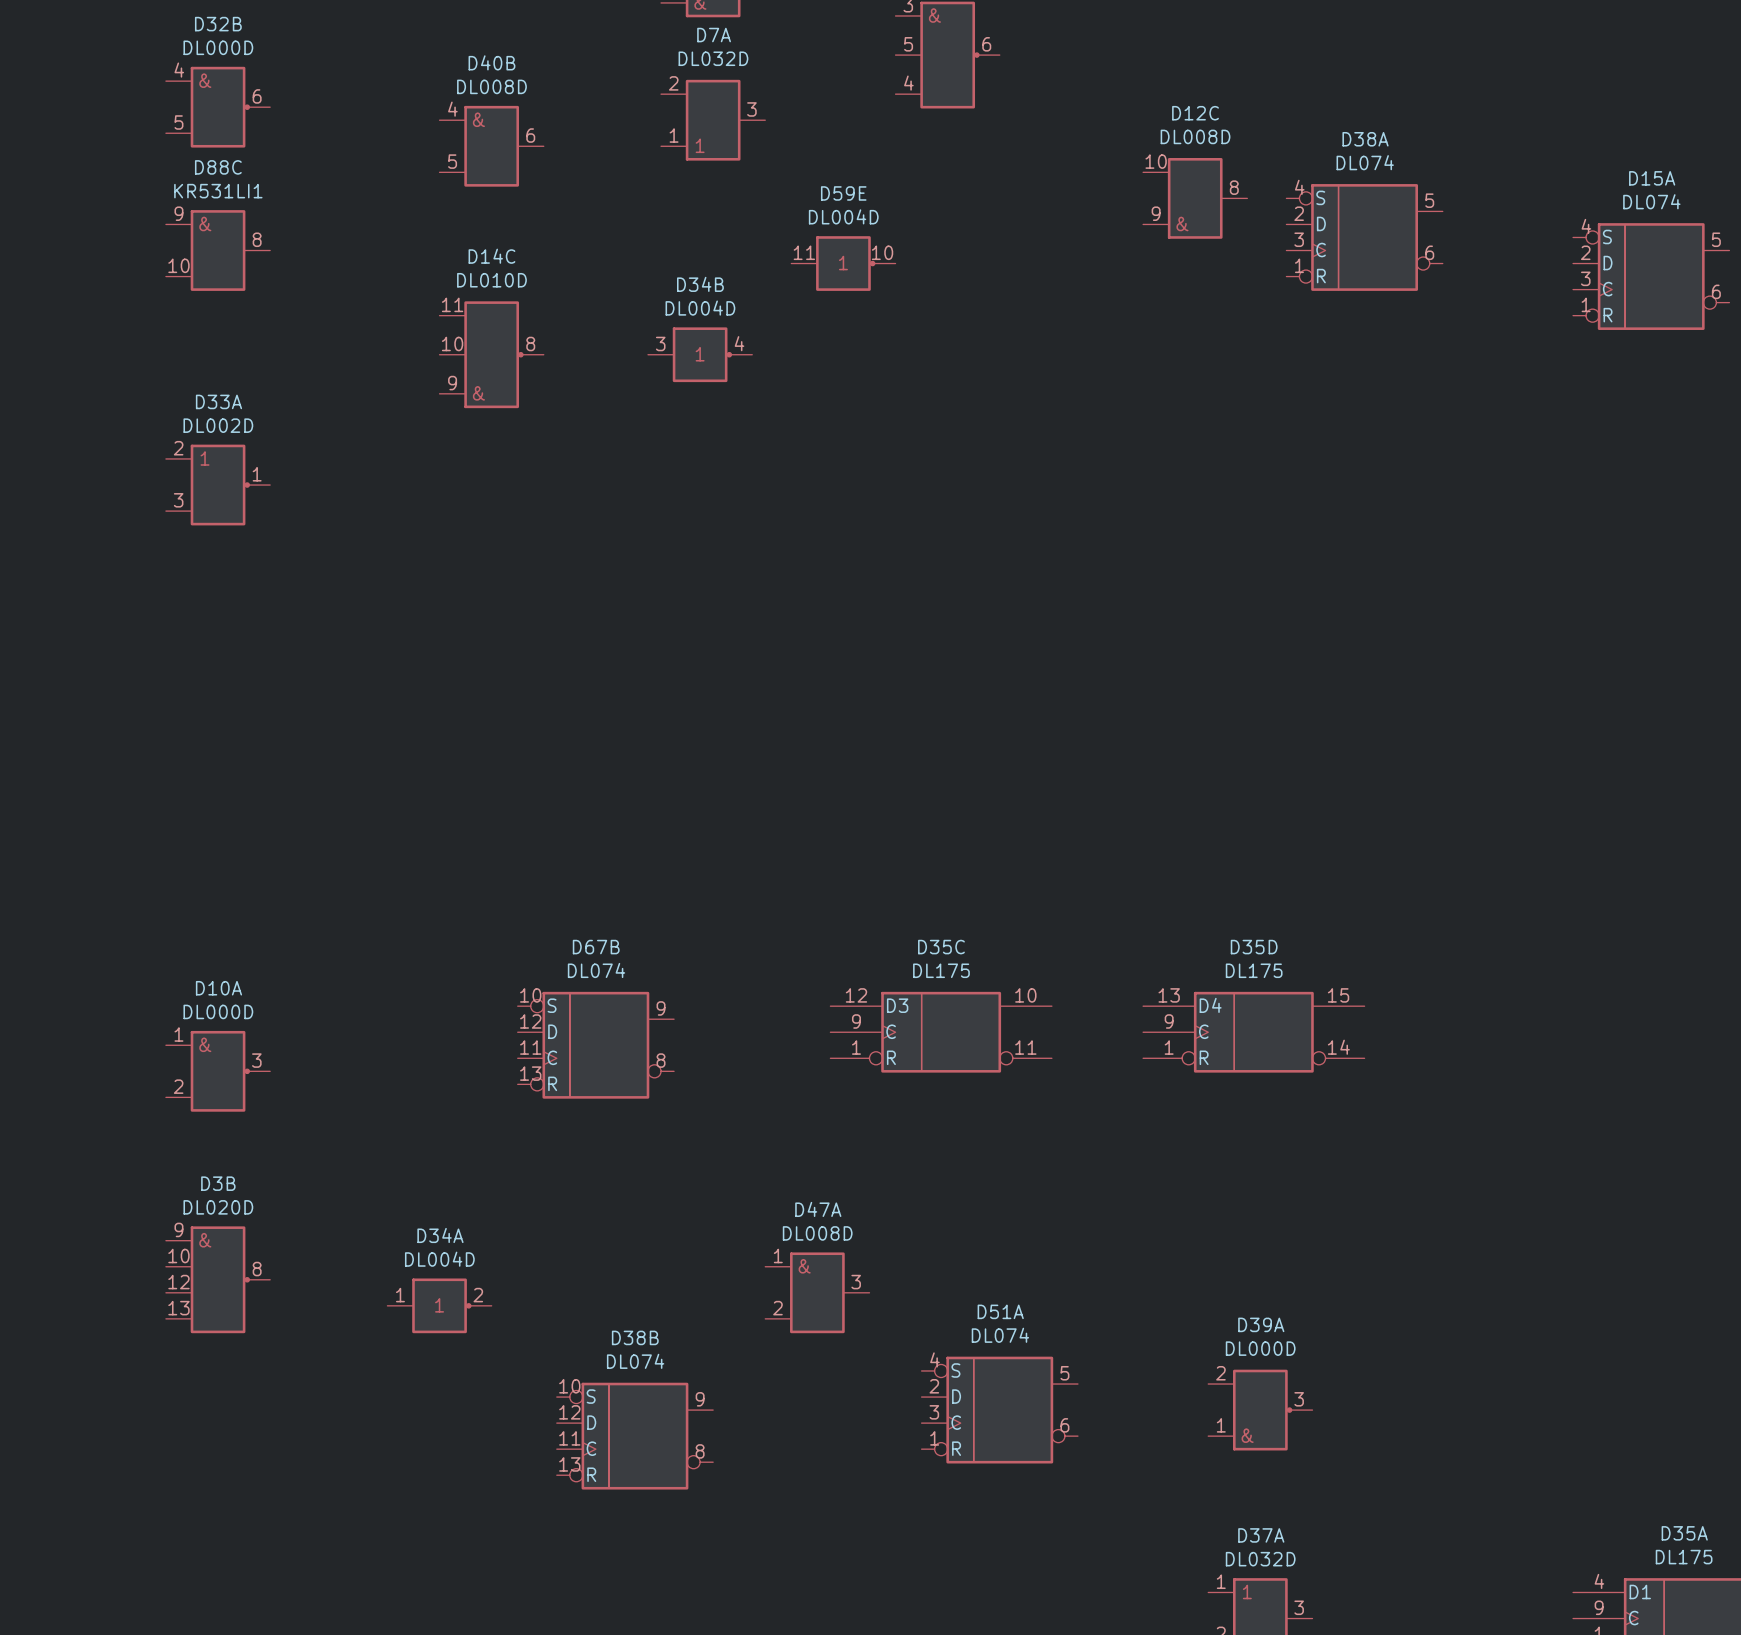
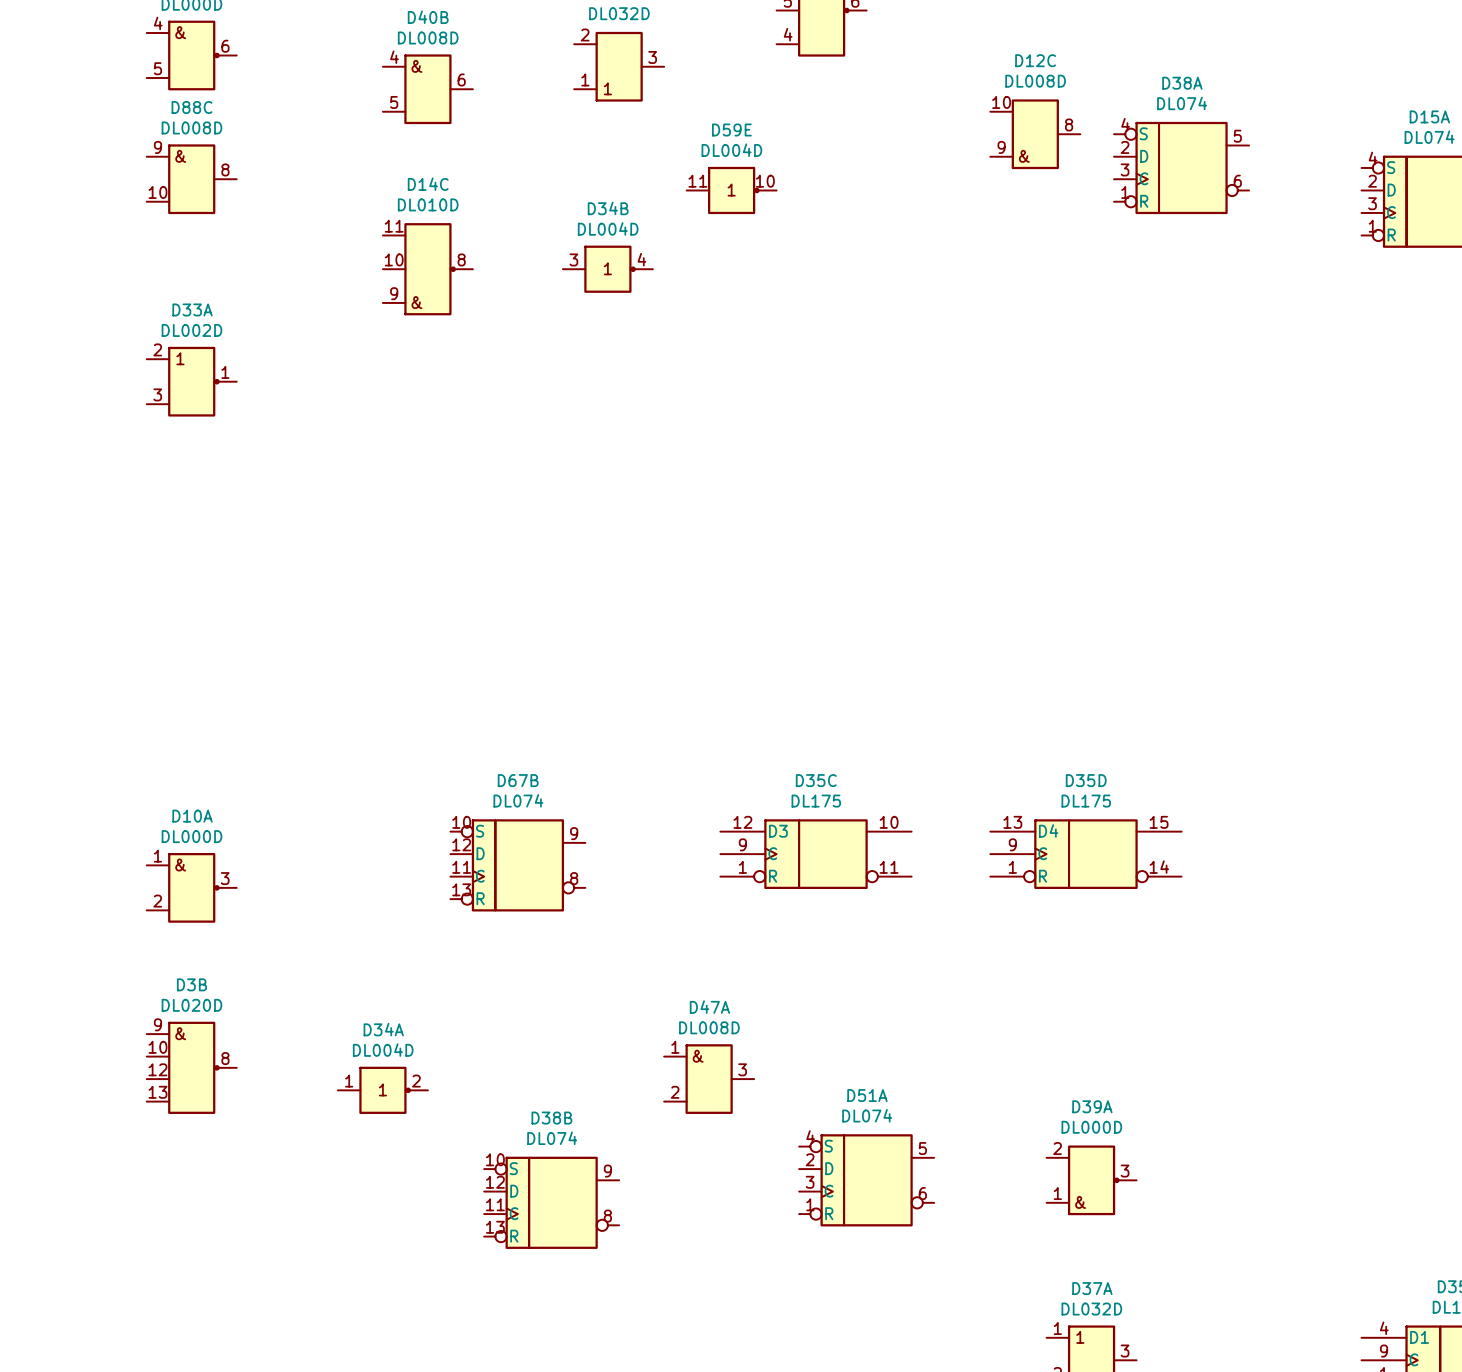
D88C value: KR531LI1 (218, 191) -> DL008D (191, 127)

